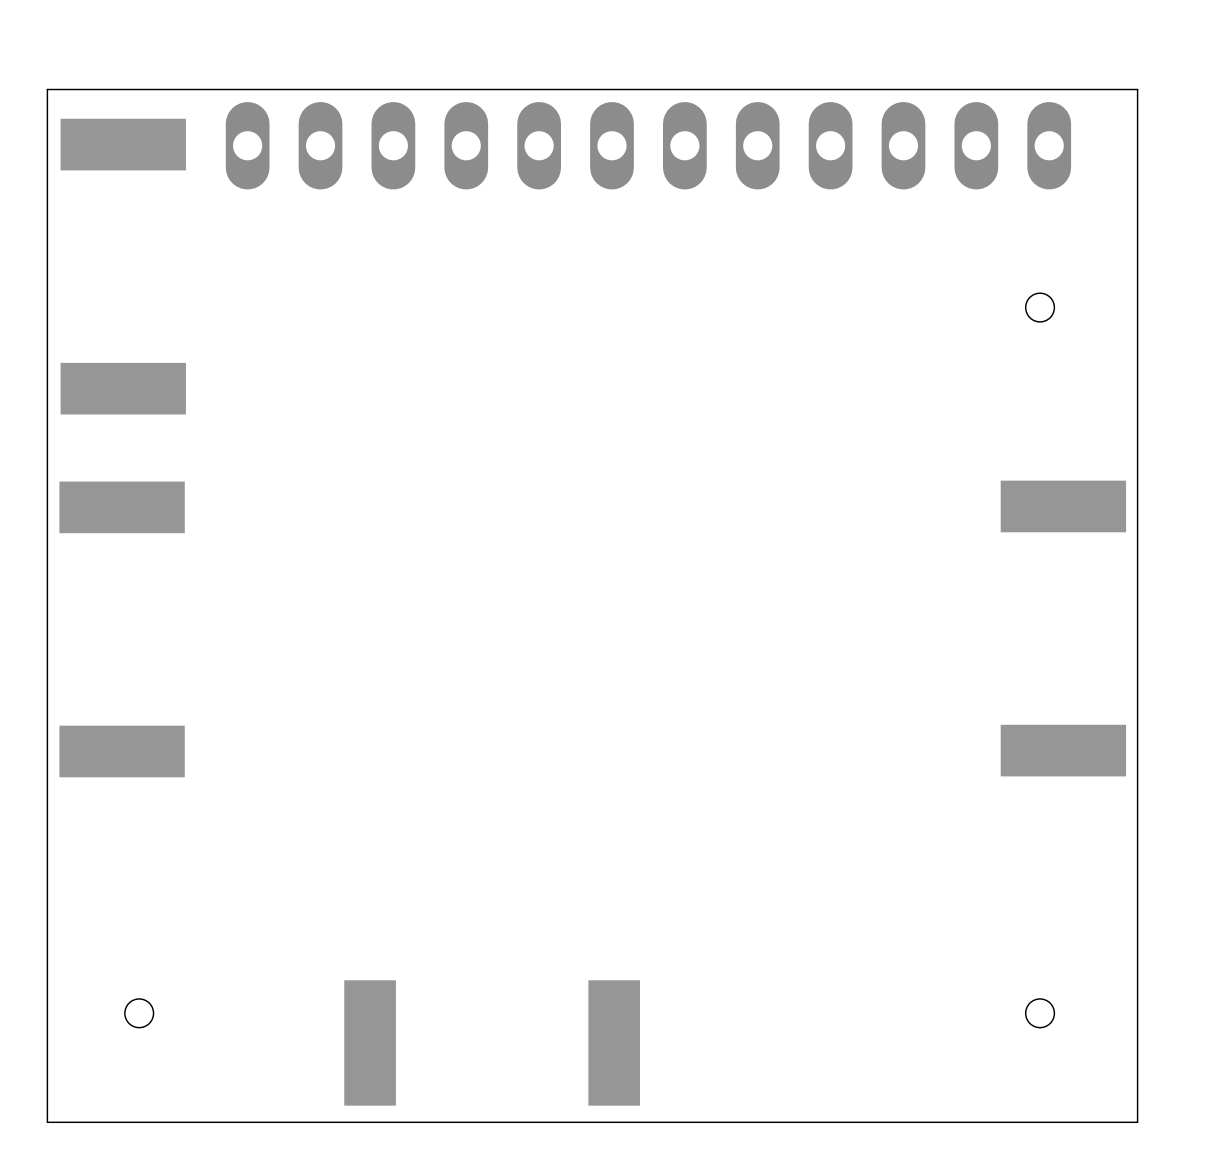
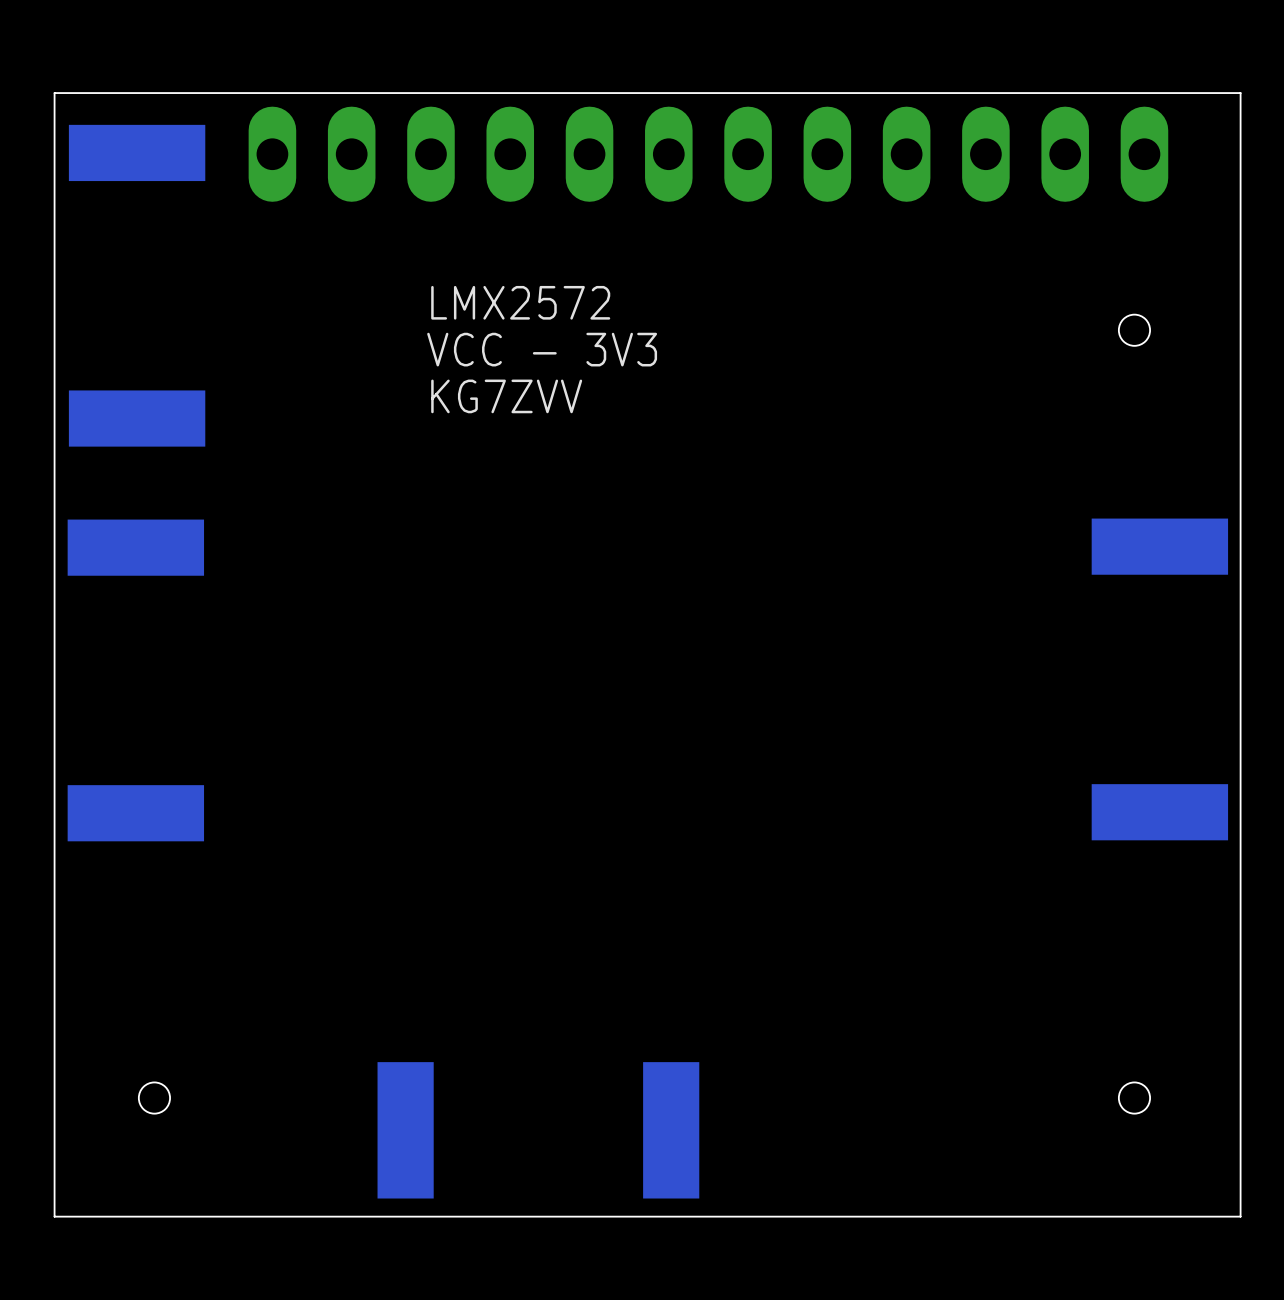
text: none -> LMX2572 (520, 302)
text: none -> VCC - 3V3 (542, 349)
text: none -> KG7ZVV (506, 396)

